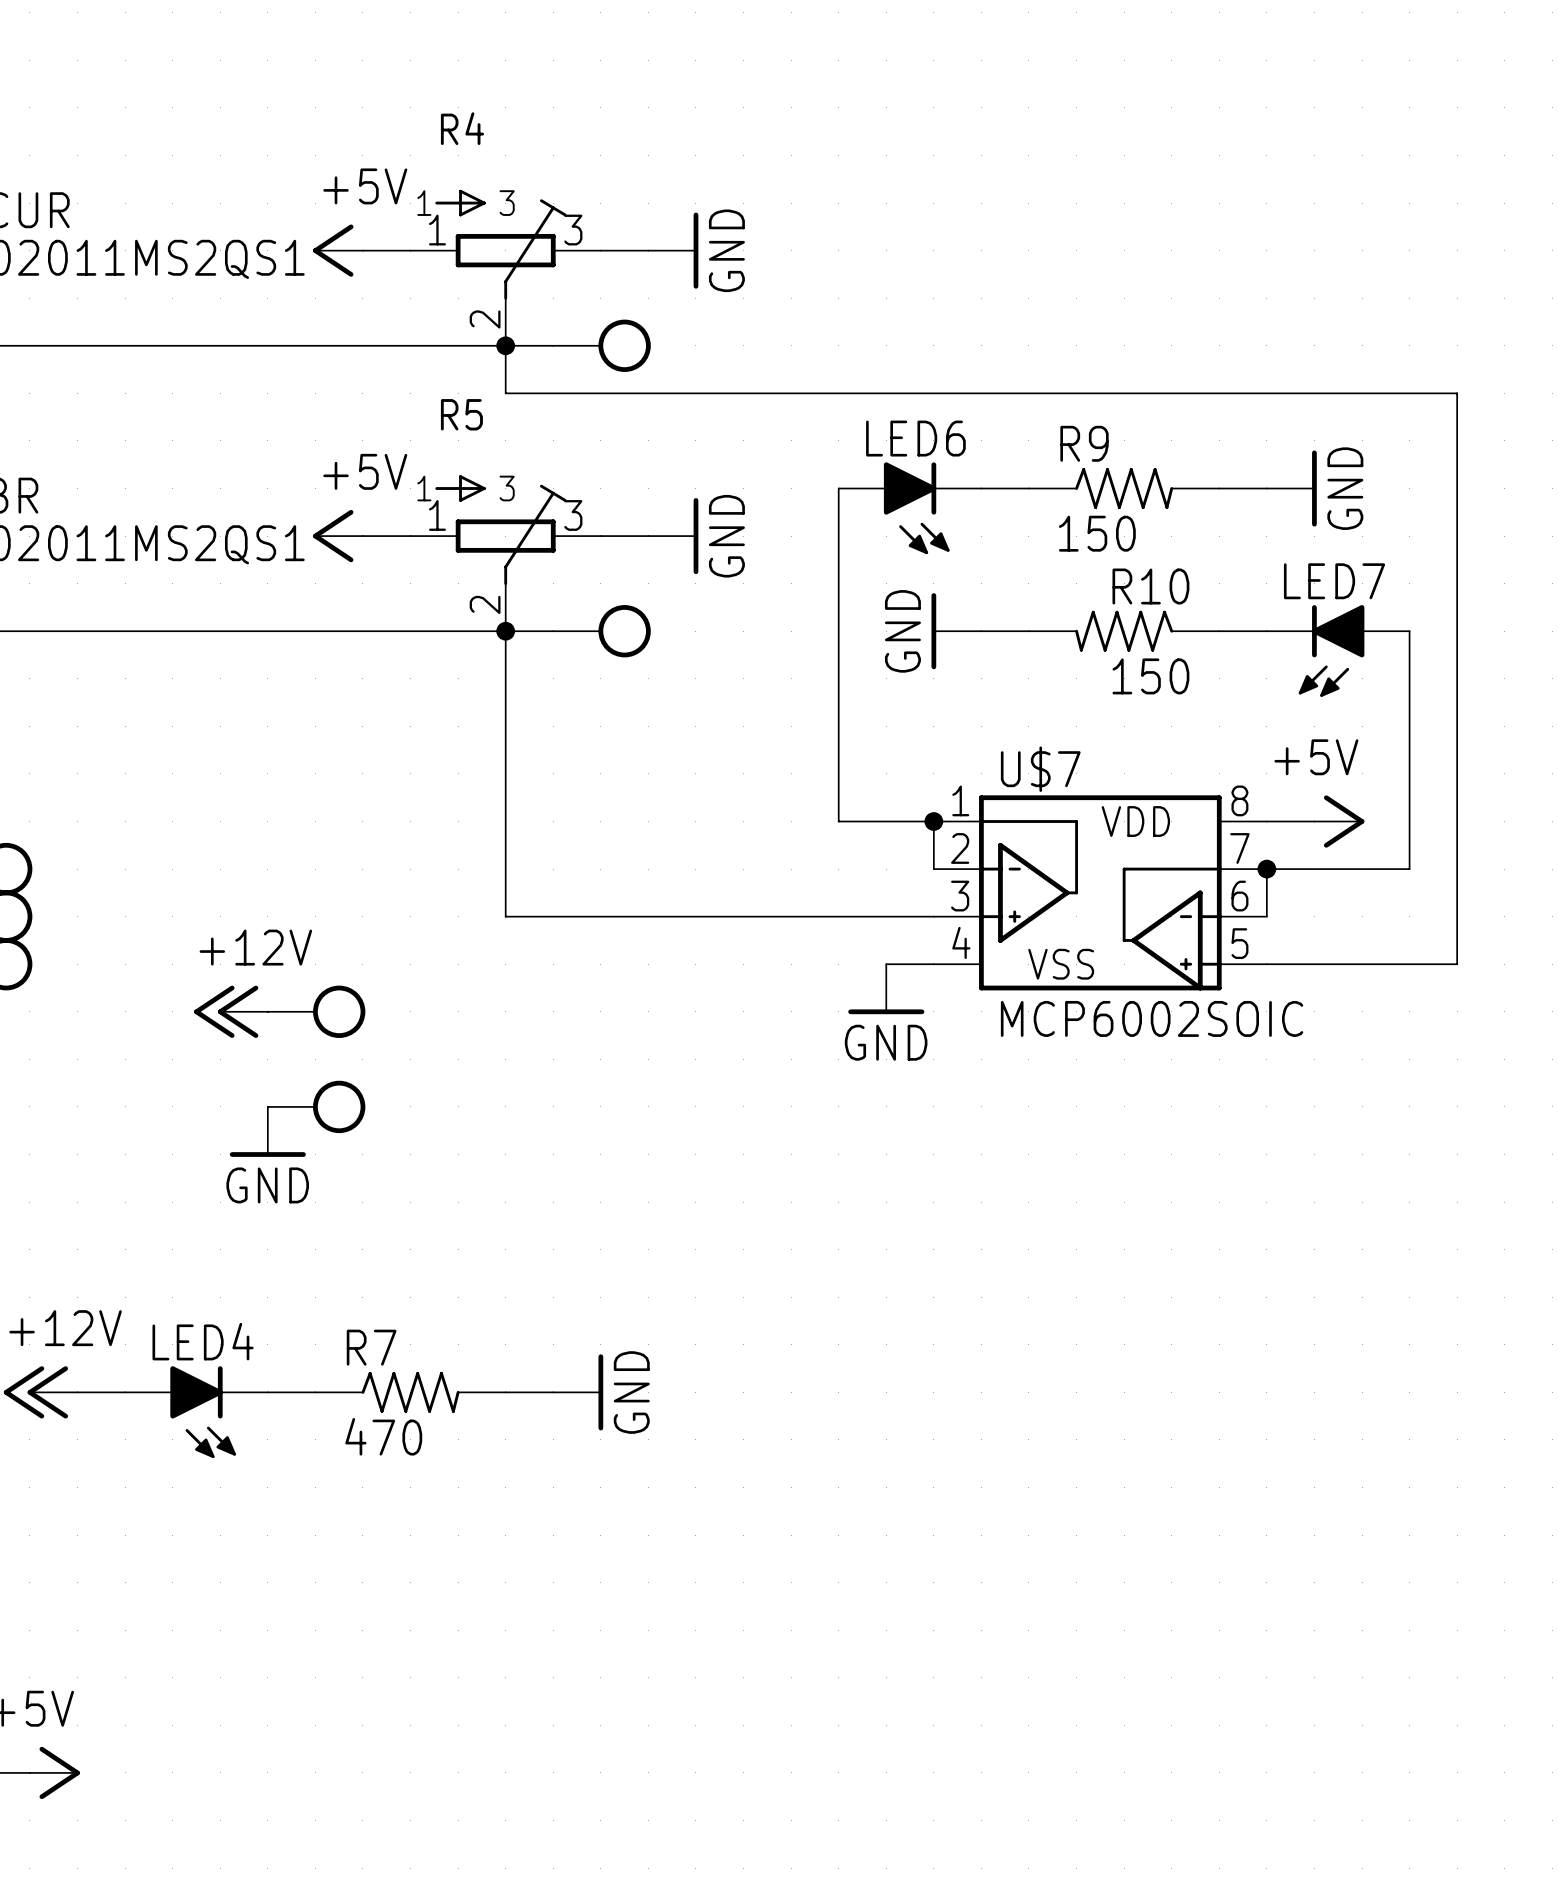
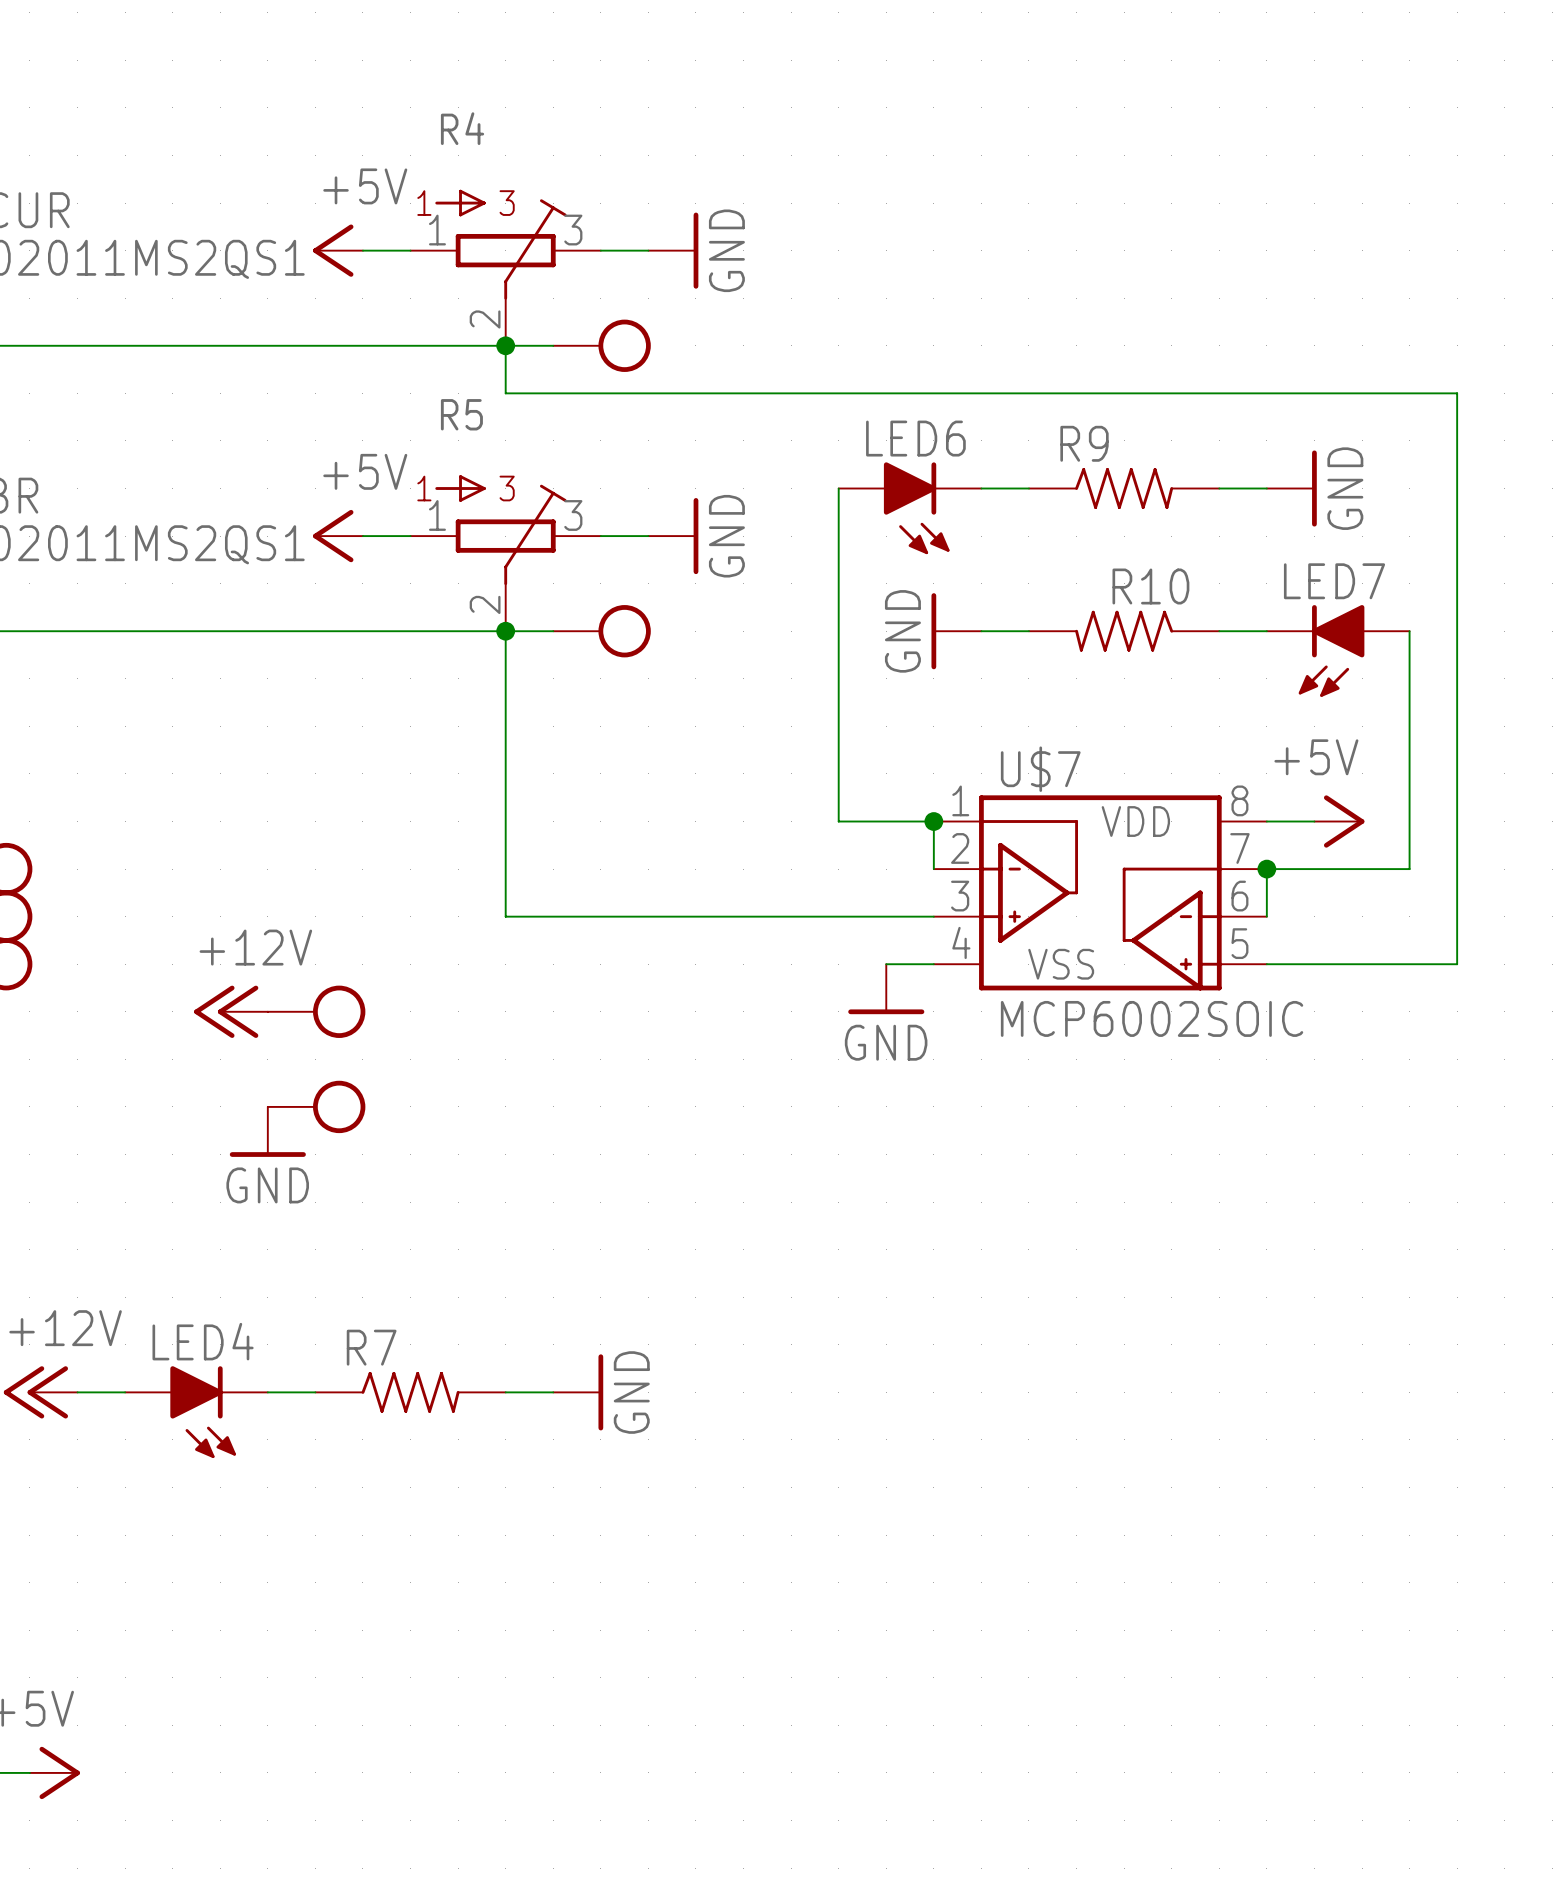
R9 value: 150 (1097, 533) -> none
R10 value: 150 (1150, 676) -> none
R7 value: 470 (383, 1436) -> none

